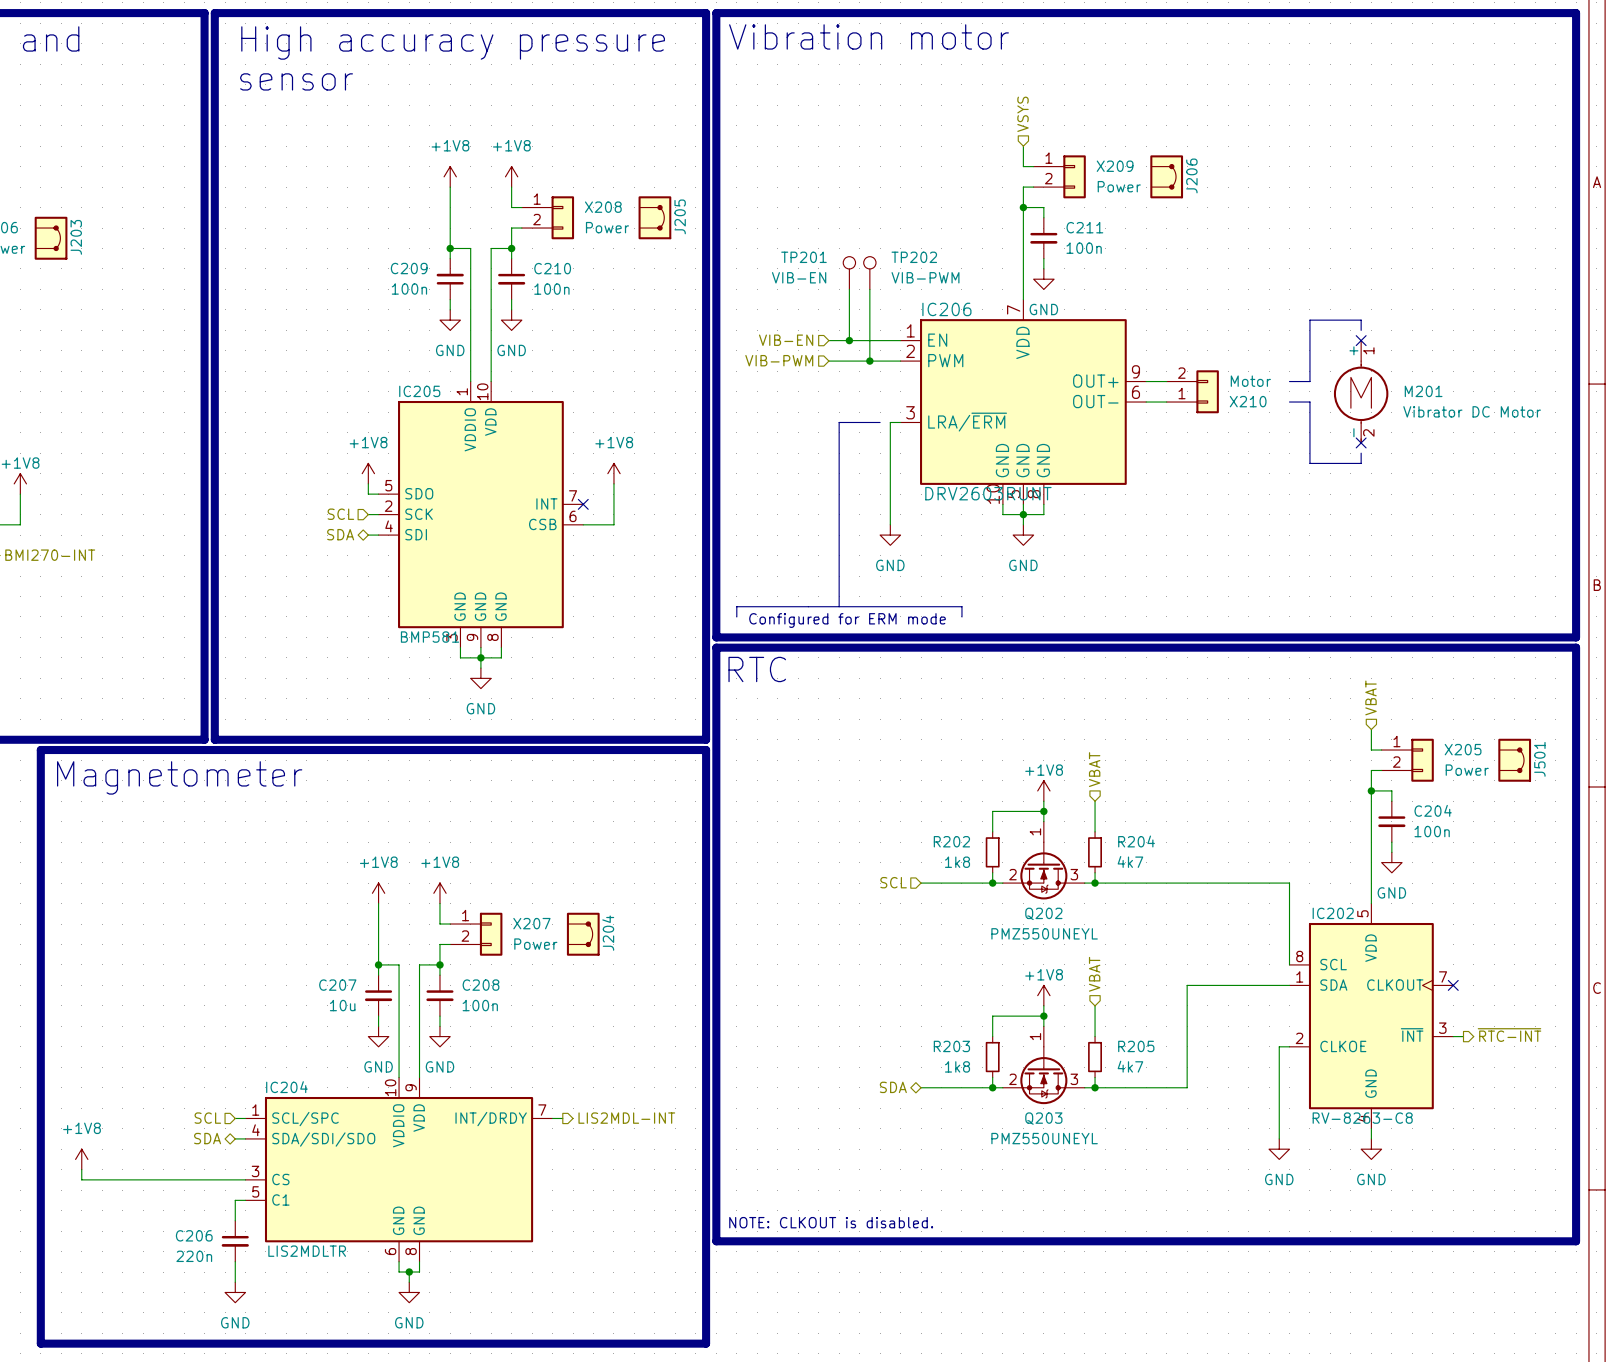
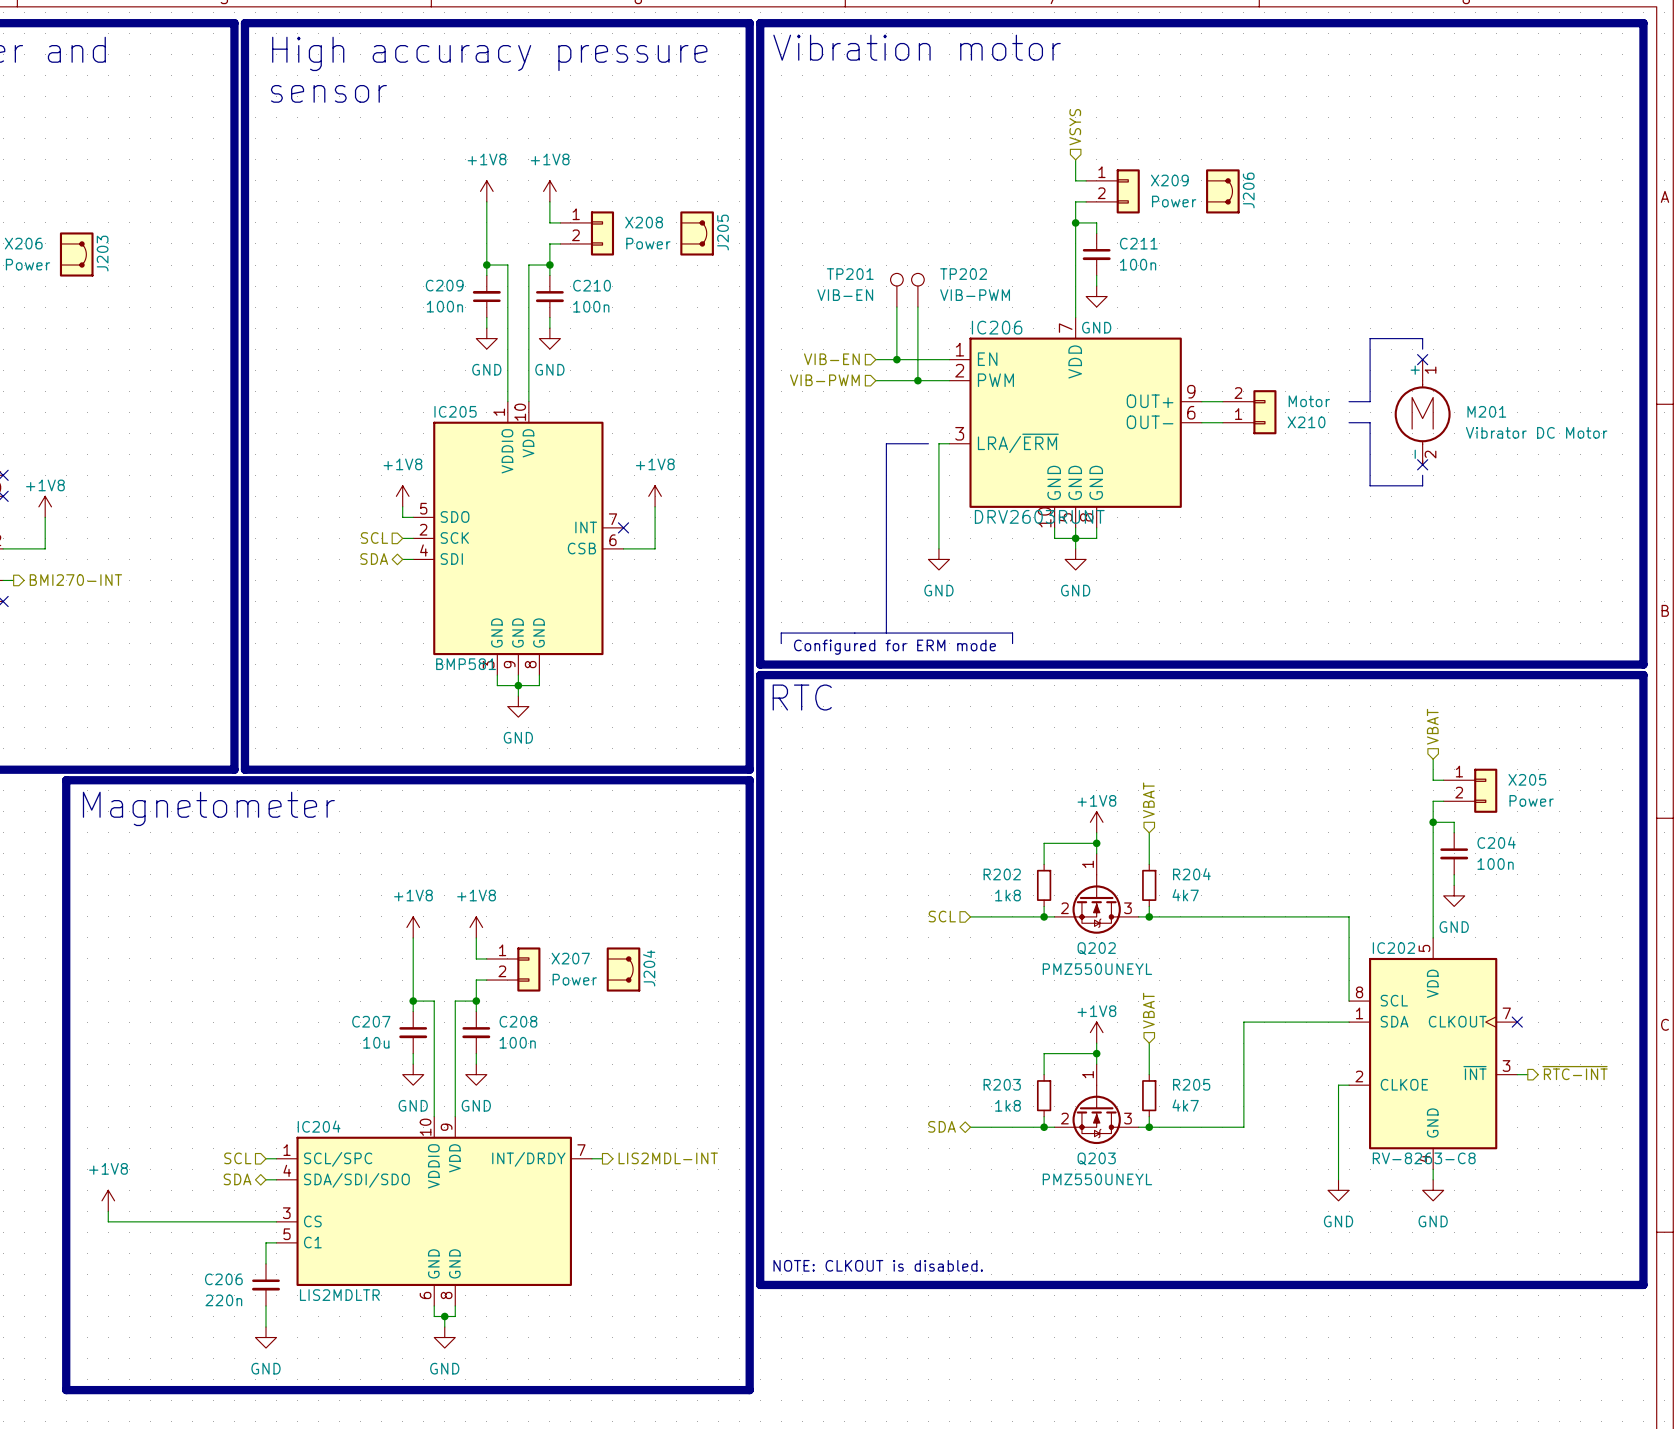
J501: (1514, 760) -> none

